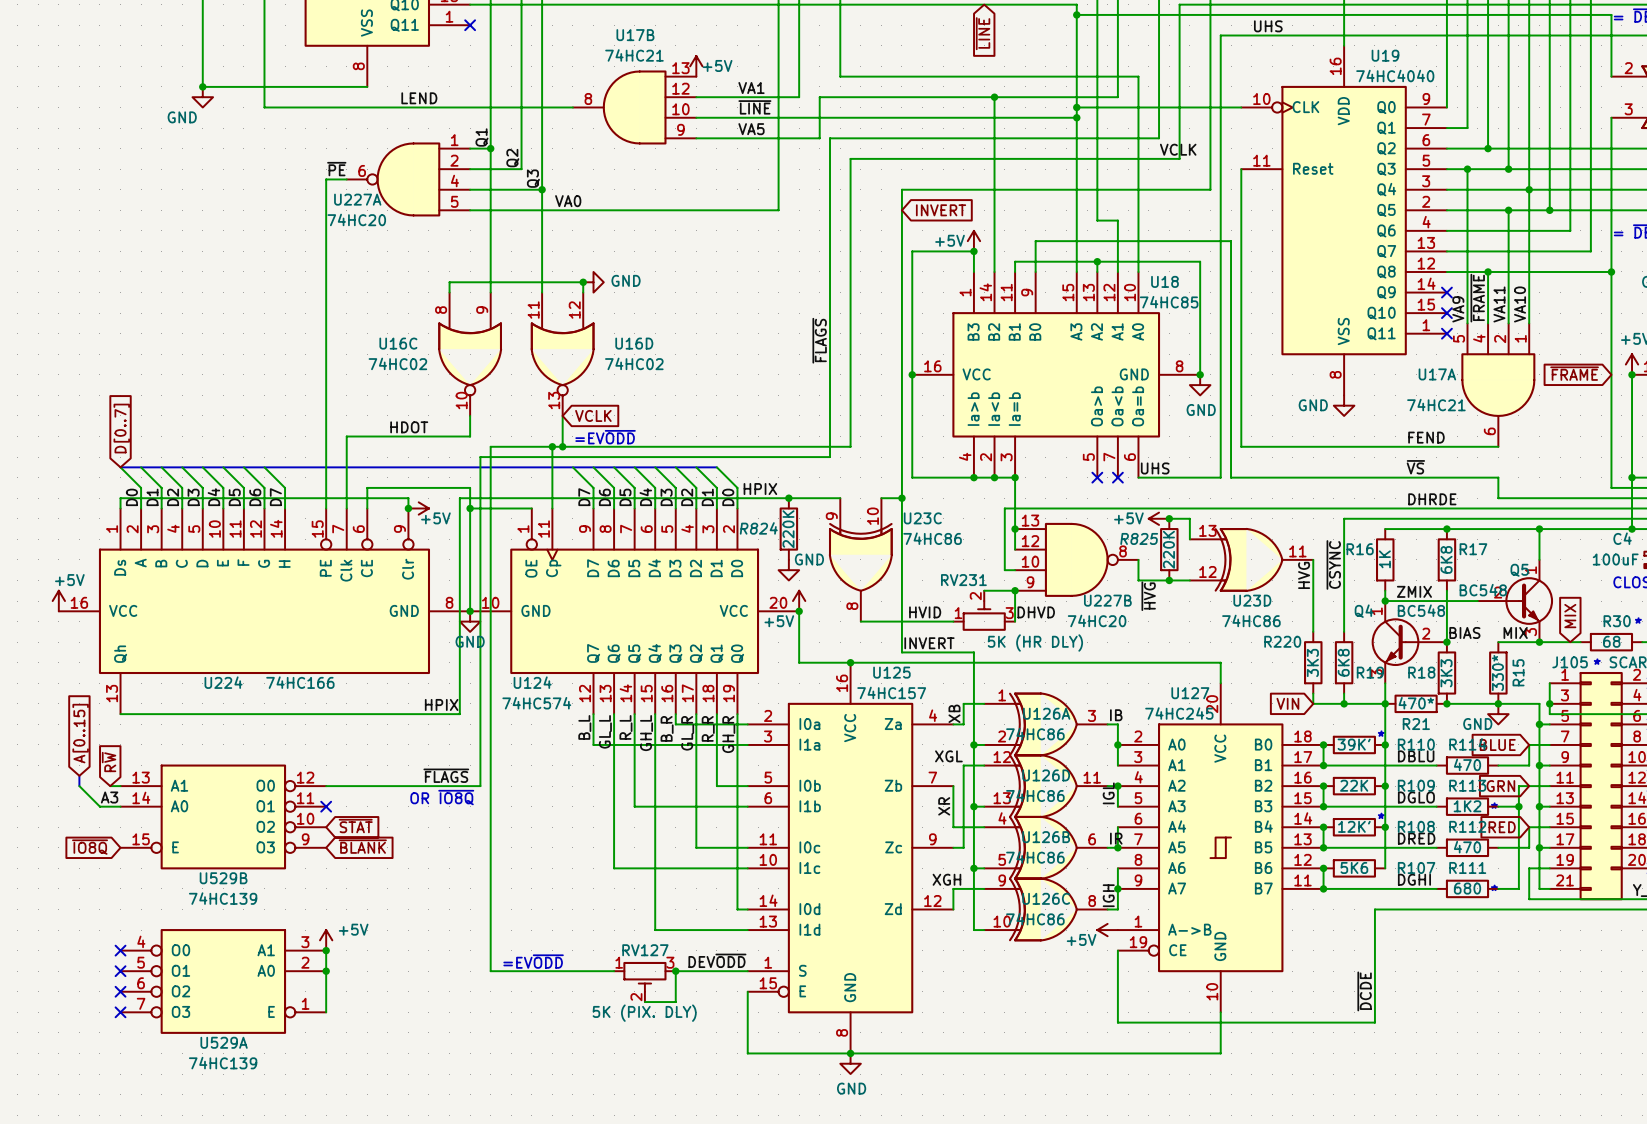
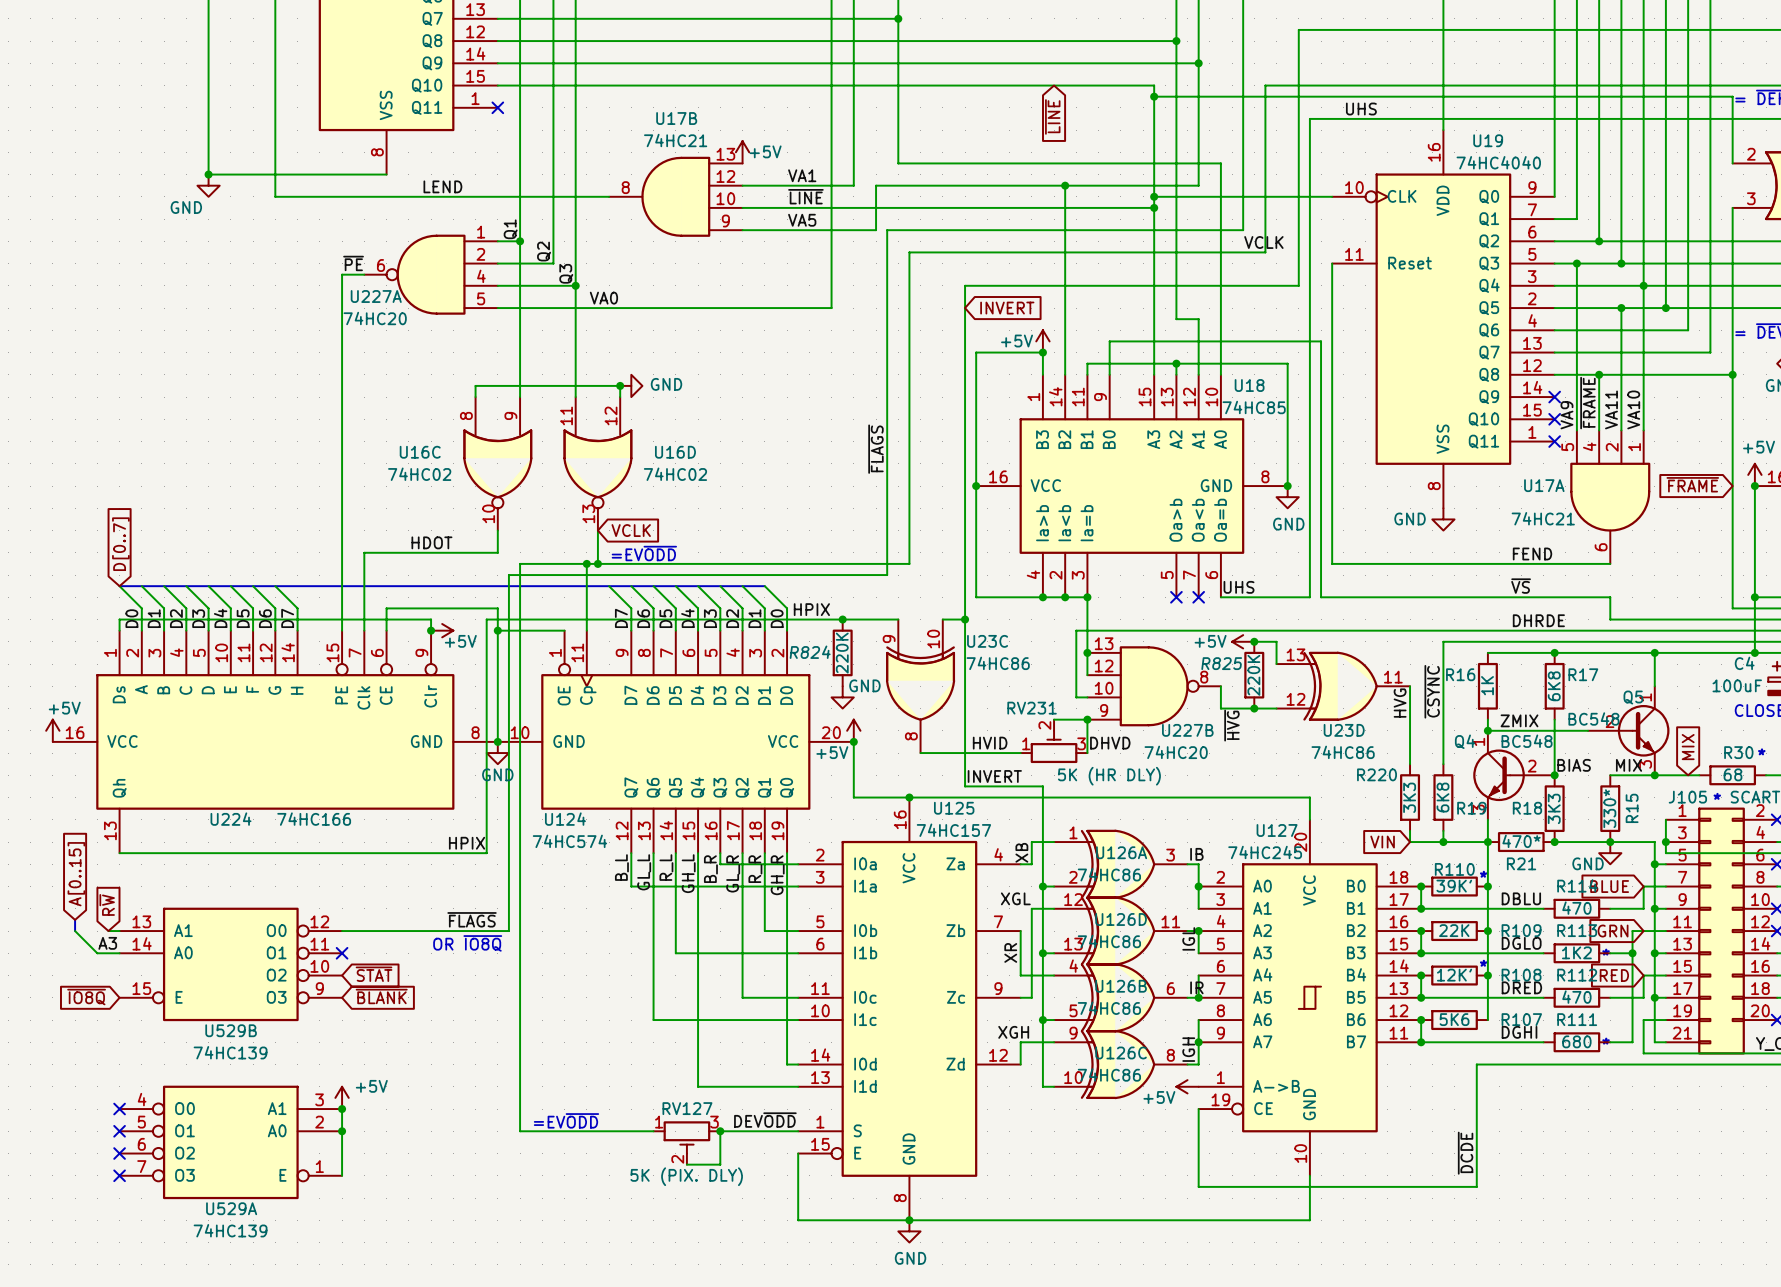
R110 name position: R110 (1416, 744) -> R110 (1454, 869)

